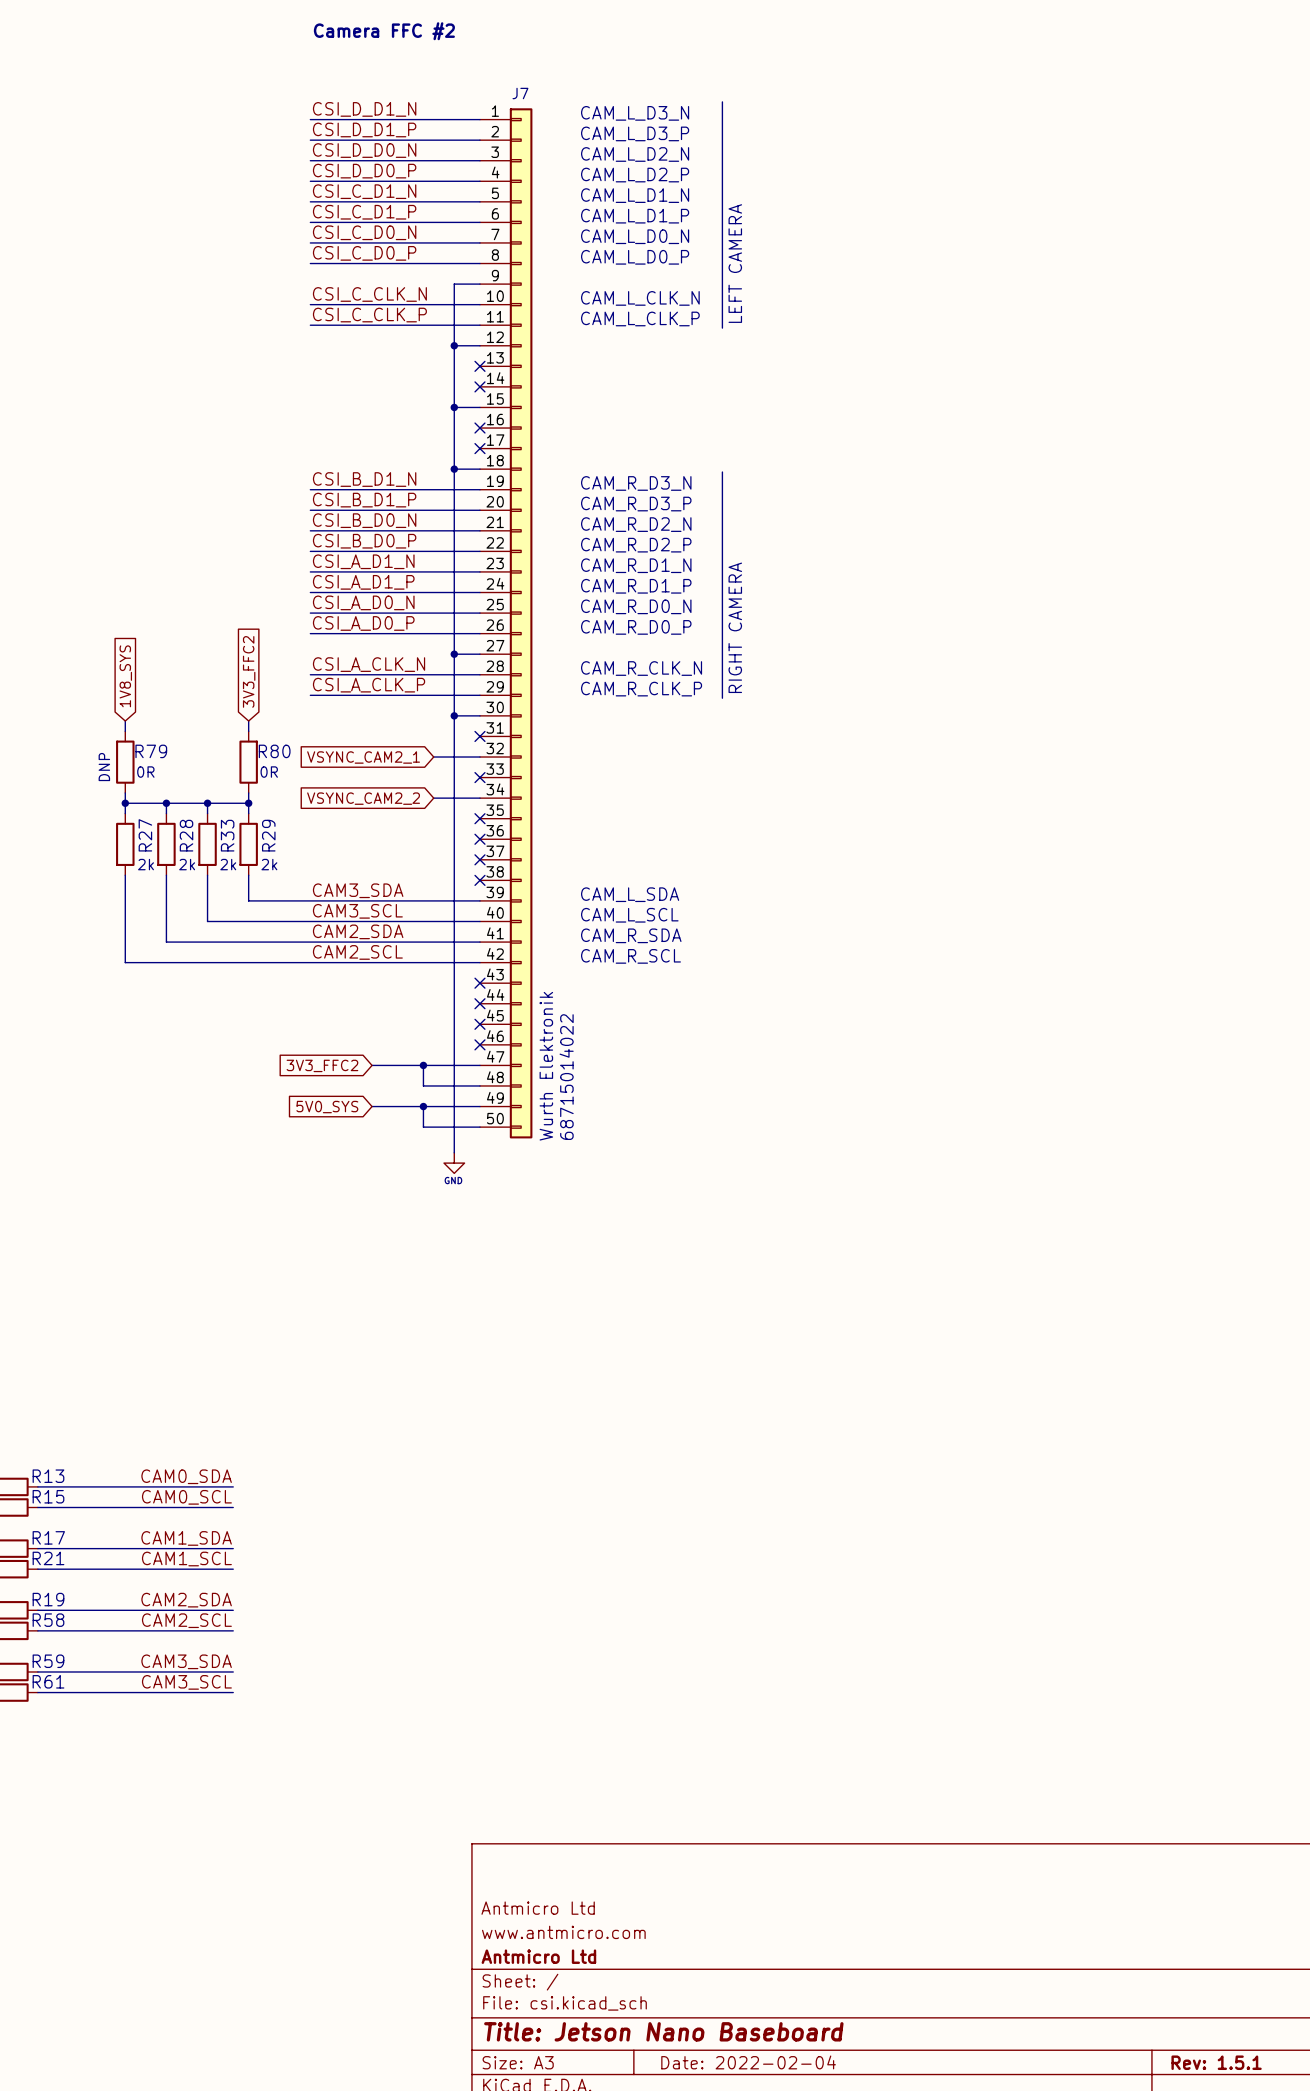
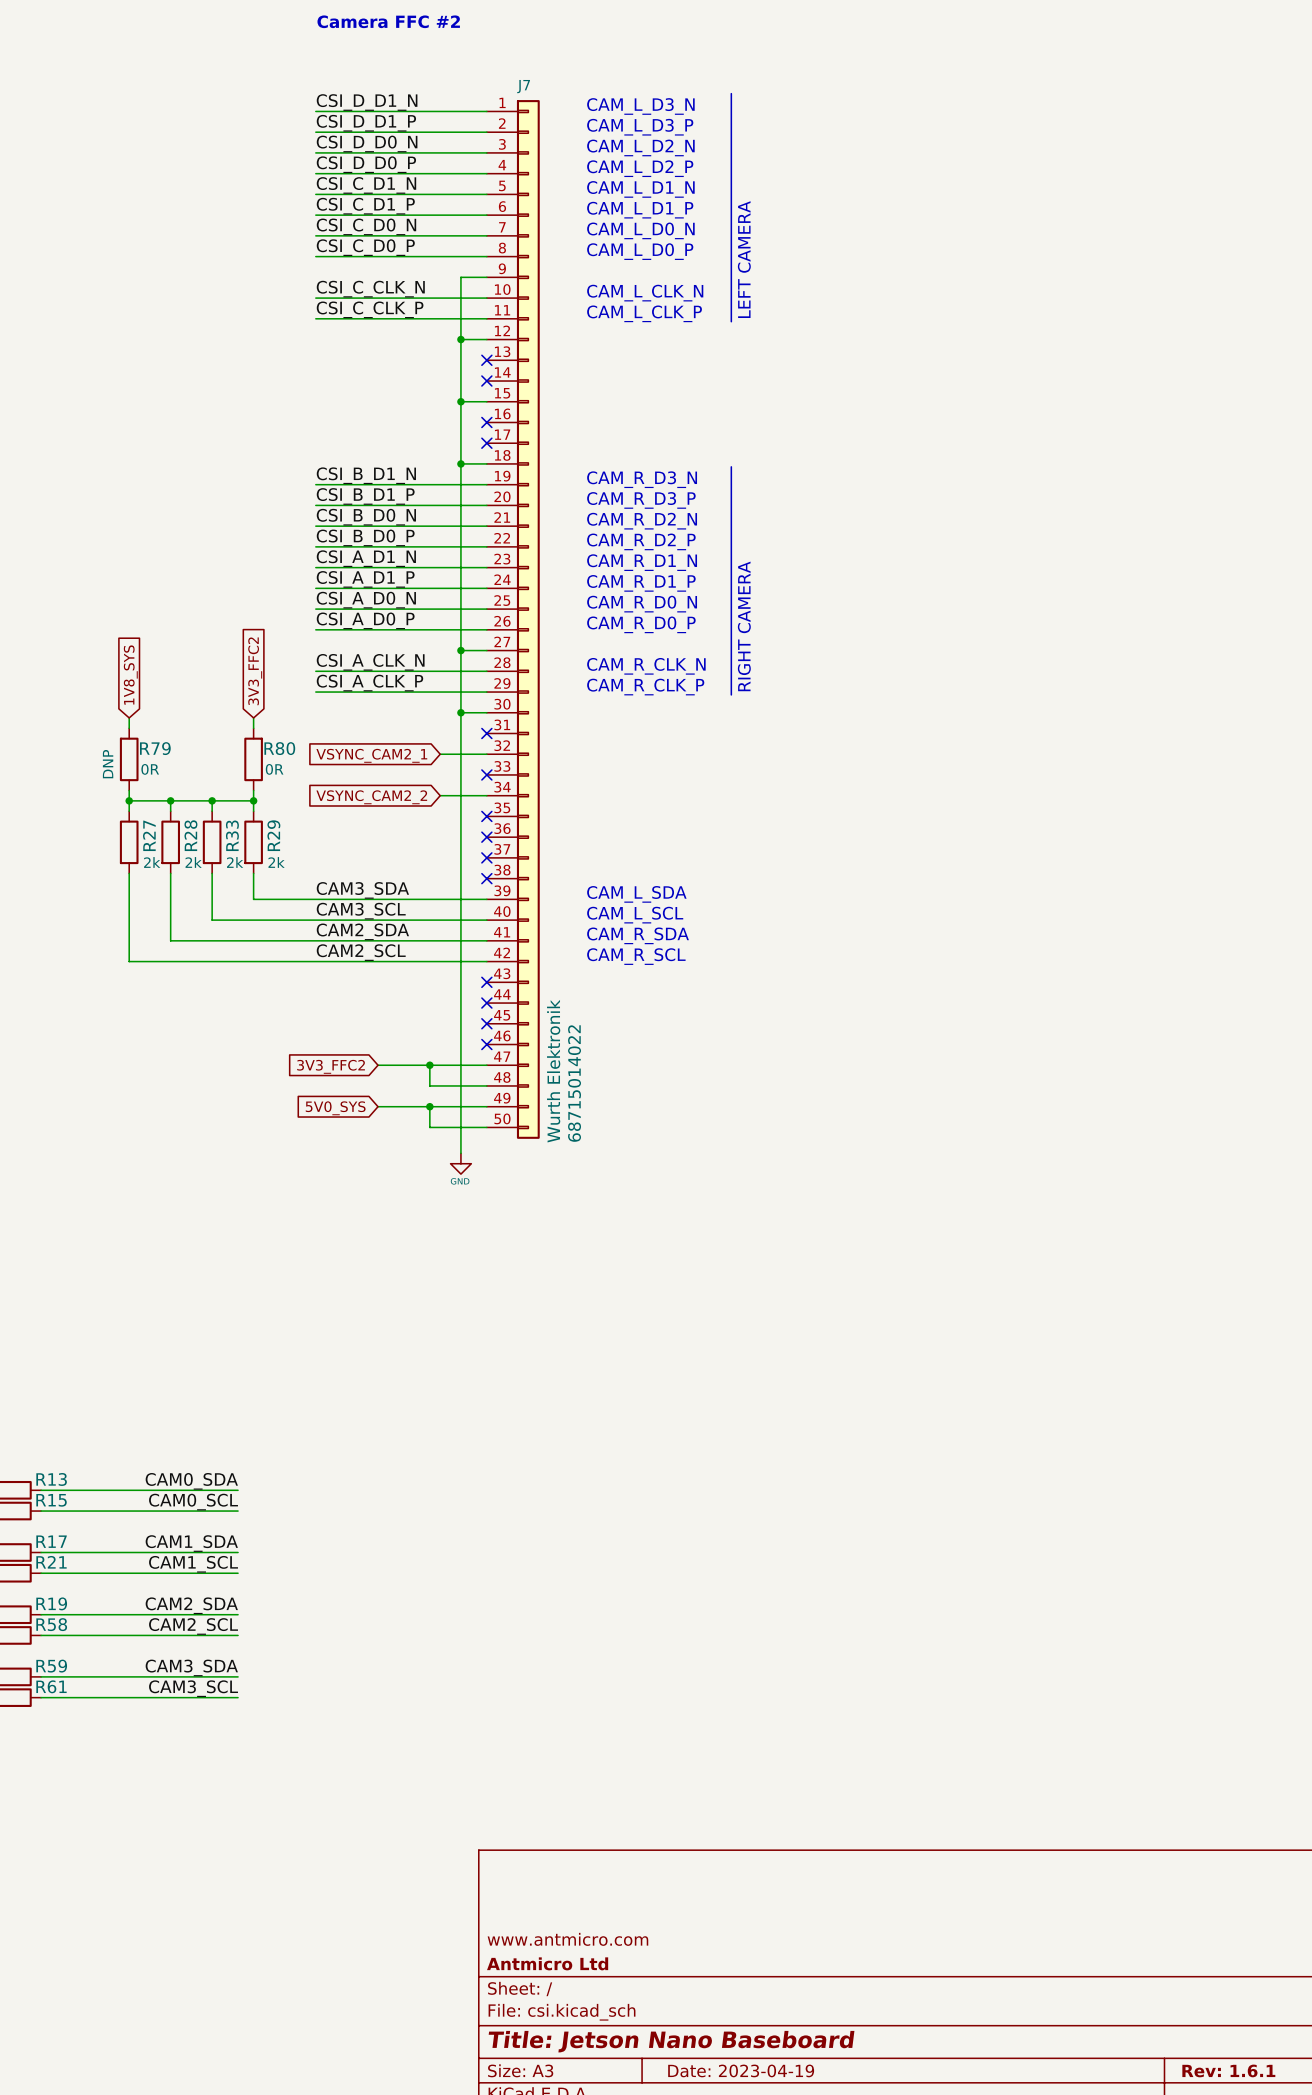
title block: Antmicro Ltd (538, 1908) -> none
title block: Date: 2022-02-04 (748, 2062) -> Date: 2023-04-19 (741, 2070)
title block: Rev: 1.5.1 (1216, 2062) -> Rev: 1.6.1 (1228, 2070)

